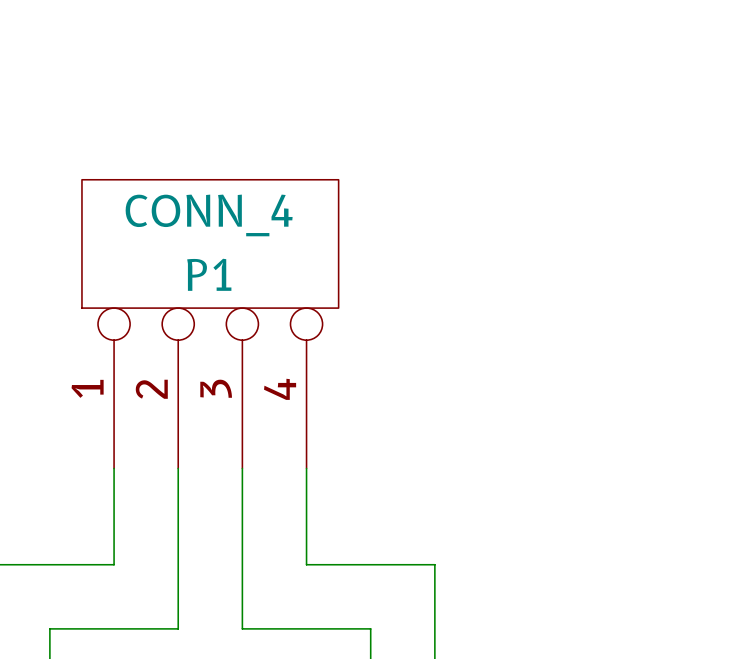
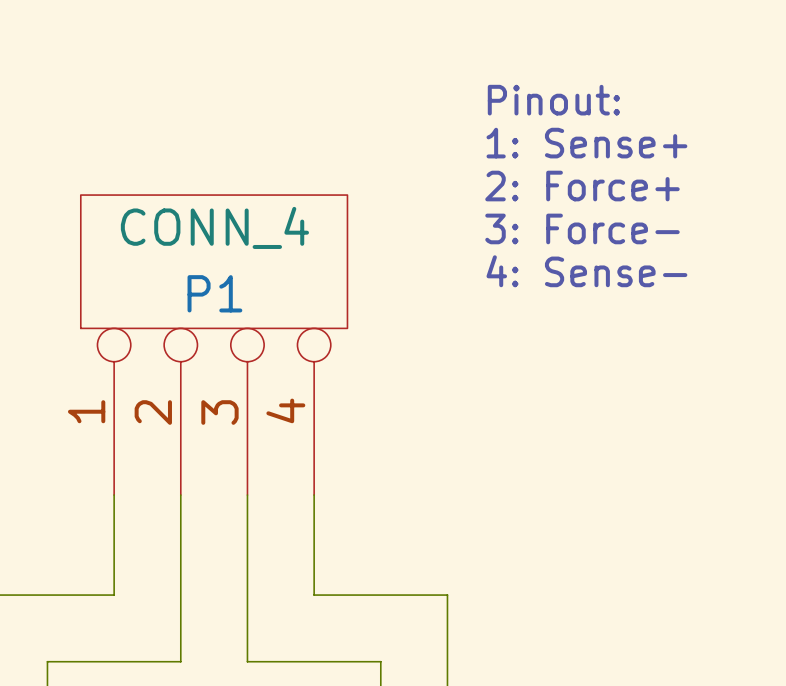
text: none -> Pinout: (553, 100)
text: none -> 1: Sense+ (586, 143)
text: none -> 2: Force+ (582, 186)
text: none -> 3: Force- (582, 228)
text: none -> 4: Sense- (586, 271)

